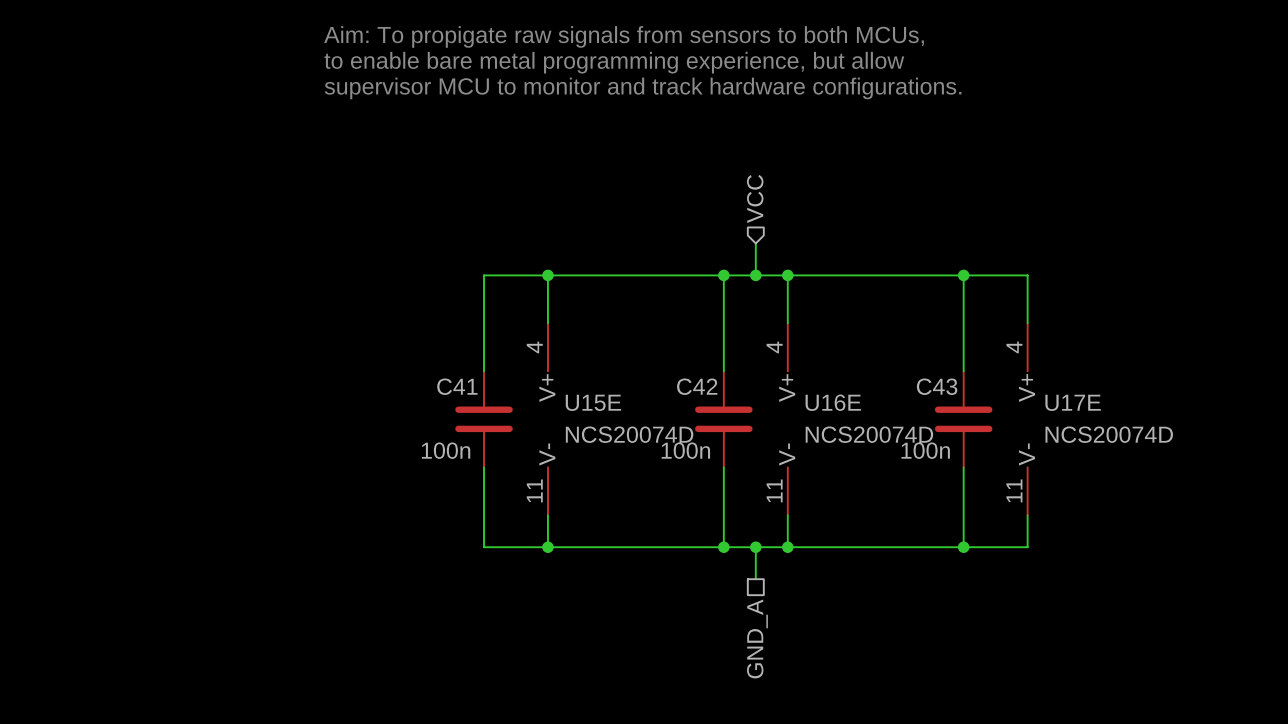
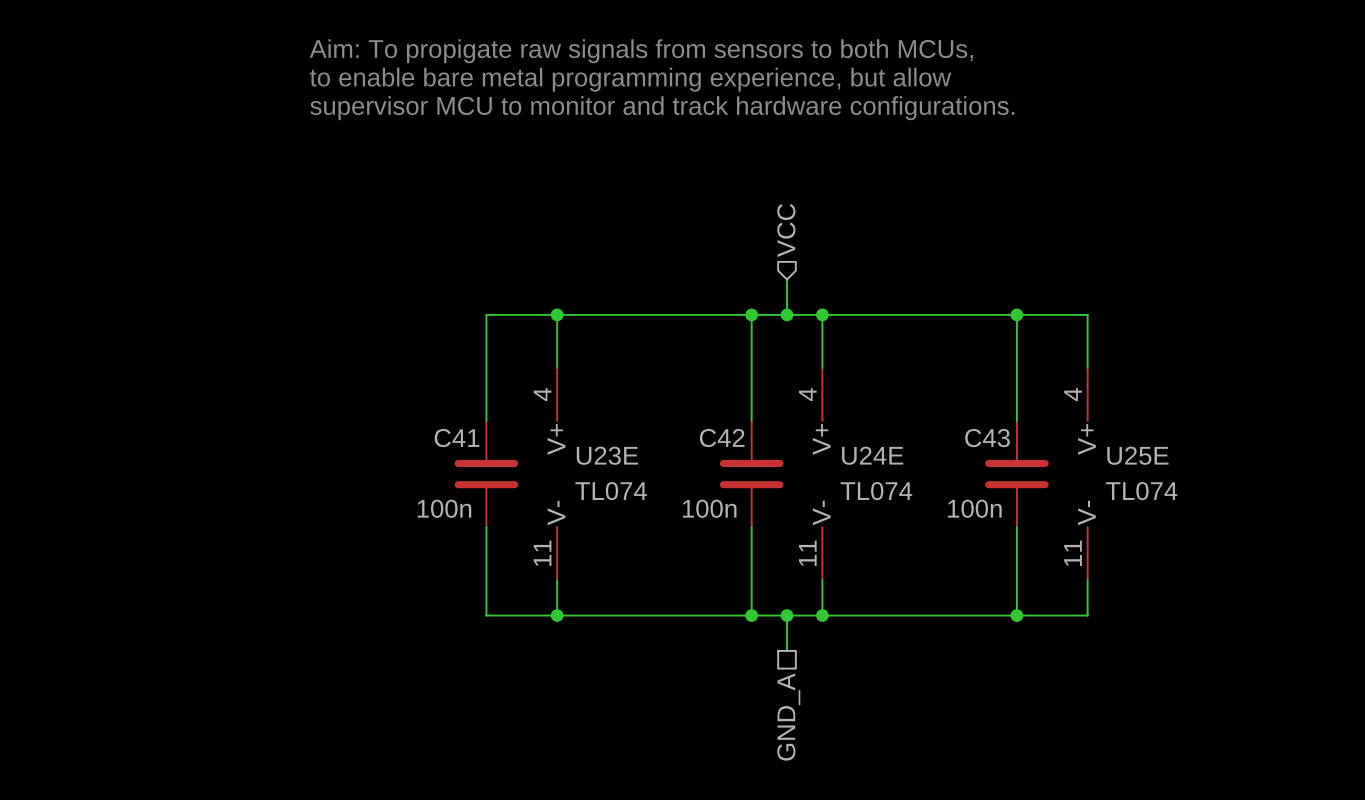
U15E name: U15E (593, 402) -> U23E (607, 455)
U16E name: U16E (833, 402) -> U24E (872, 455)
U17E name: U17E (1073, 402) -> U25E (1137, 455)
U15E value: NCS20074D (629, 434) -> TL074 (611, 491)
U16E value: NCS20074D (869, 434) -> TL074 (876, 491)
U17E value: NCS20074D (1109, 434) -> TL074 (1141, 491)

